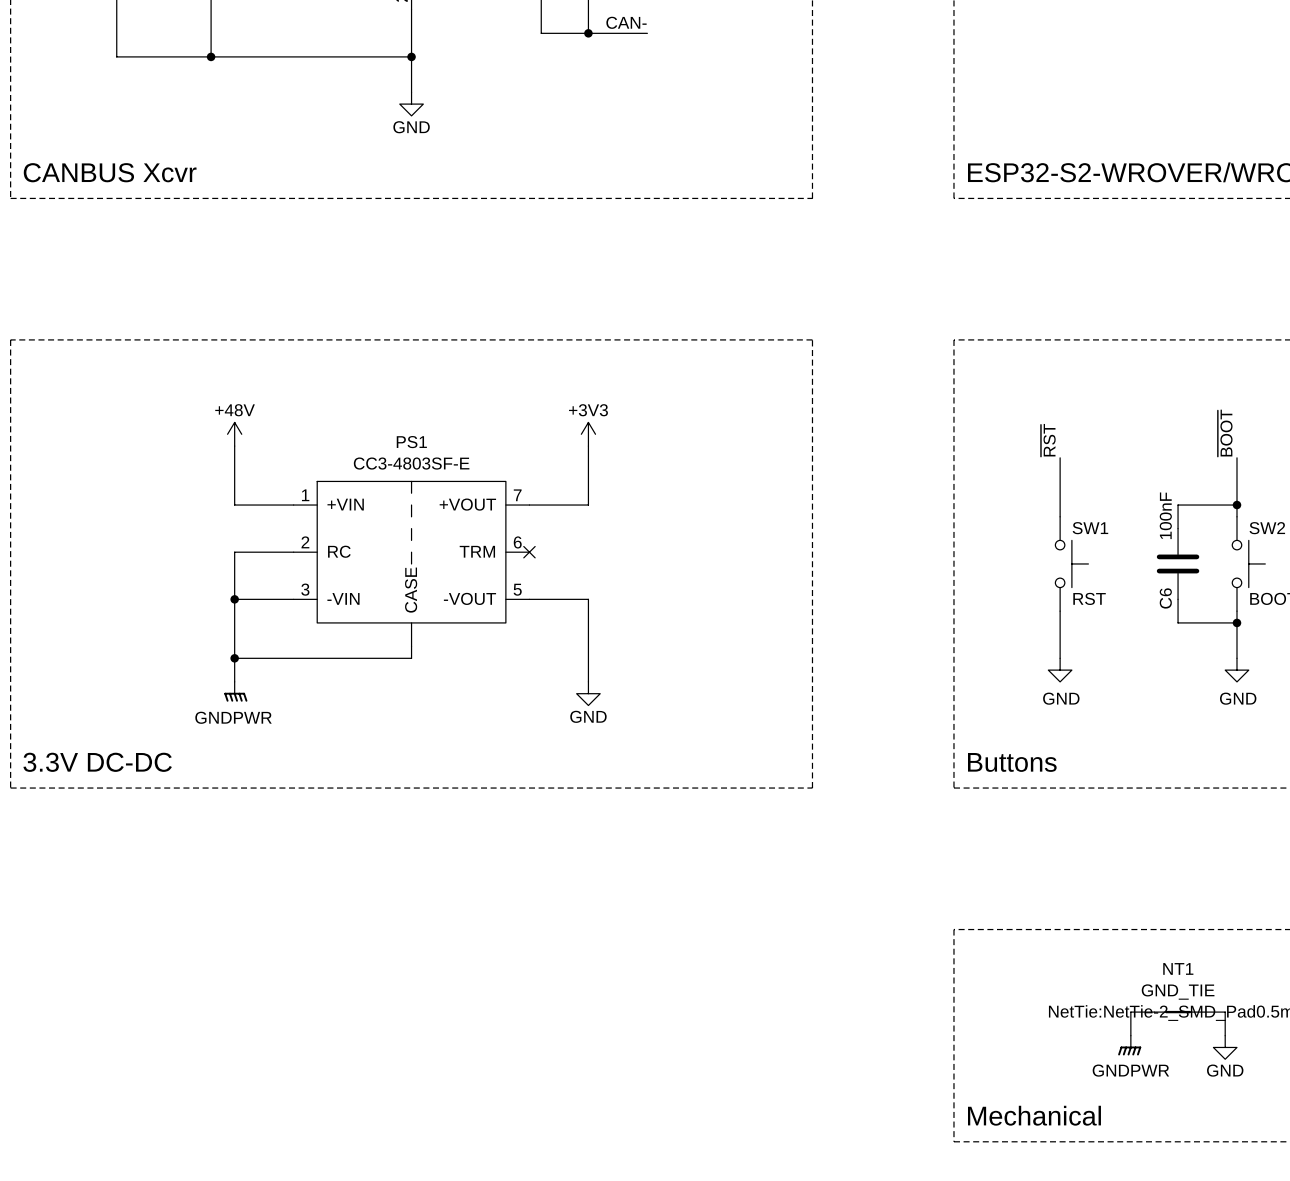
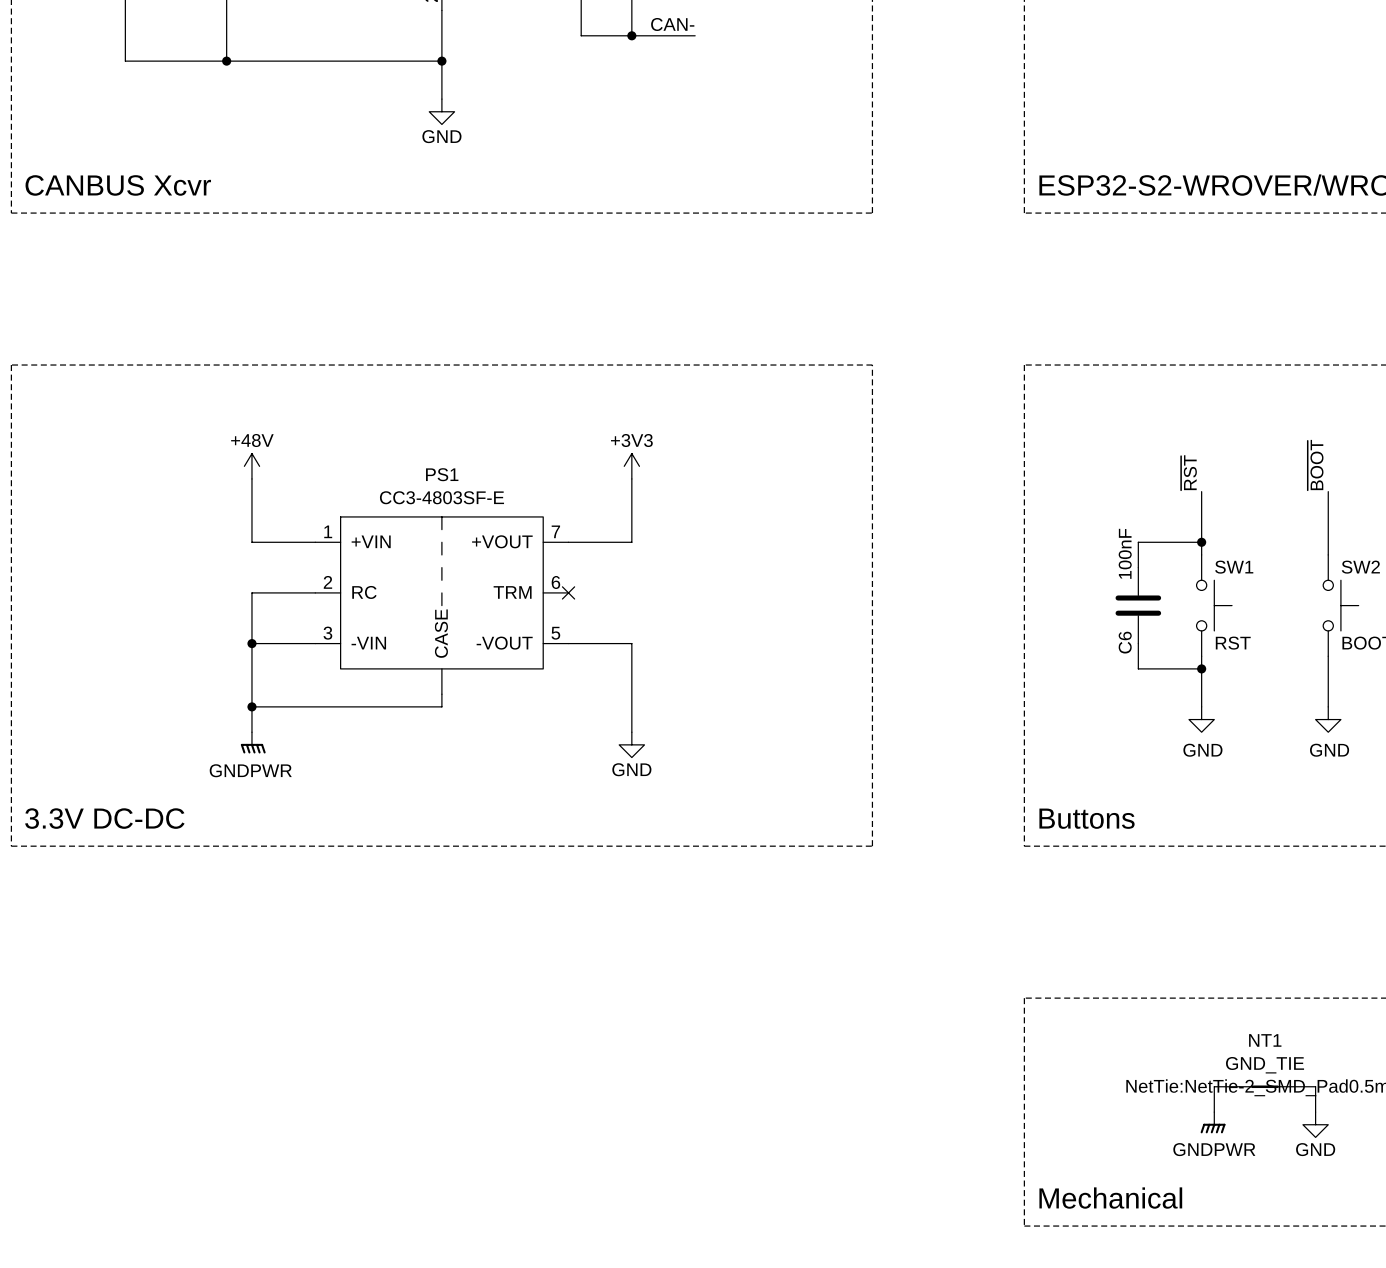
label position: ~{RST} (1048, 440) -> ~{RST} (1188, 472)
wire: (1060, 457) (1060, 505) -> (1201, 542) (1138, 542)
wire: none -> (1201, 491) (1201, 554)
junction: none -> (1201, 542)
wire: (1236, 505) (1178, 505) (1178, 528) -> none
junction: (1236, 505) -> none
SW1 position: (1071, 563) -> (1214, 605)
C6 position: (1178, 563) -> (1138, 605)
wire: (1178, 599) (1178, 622) (1236, 622) -> none
wire: none -> (1201, 656) (1201, 706)
wire: (1060, 622) (1060, 658) -> (1138, 668) (1201, 668)
junction: none -> (1201, 668)
junction: (1236, 622) -> none
power symbol position: GND (1060, 670) -> GND (1201, 719)

